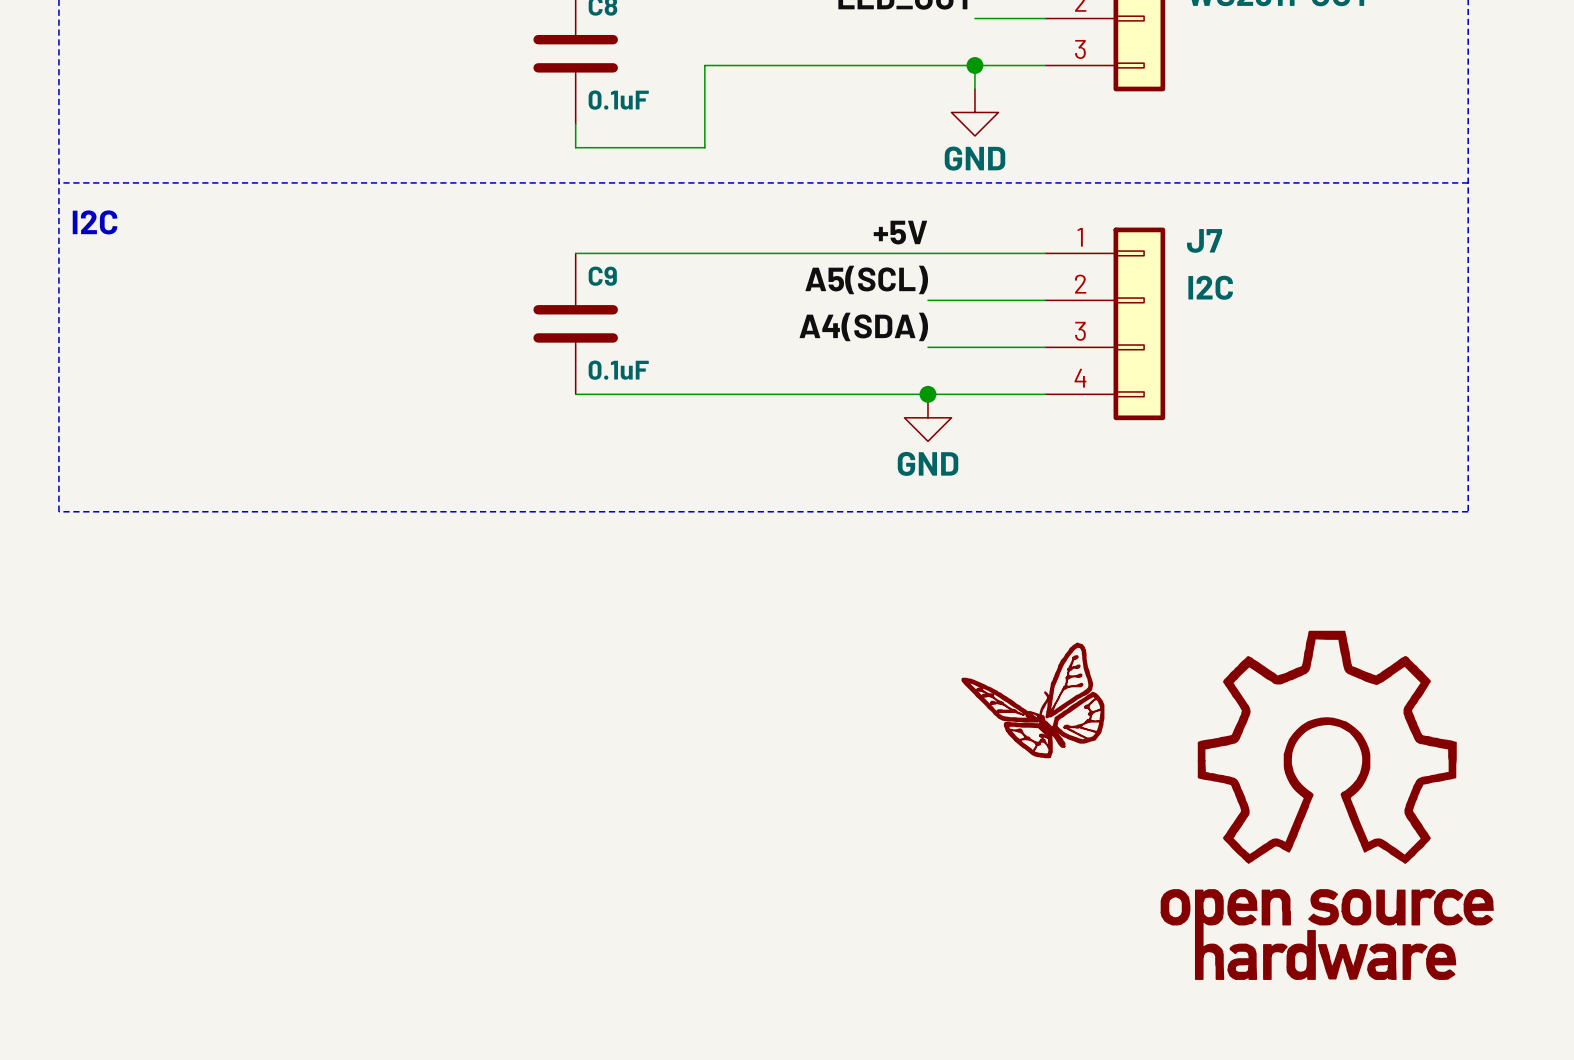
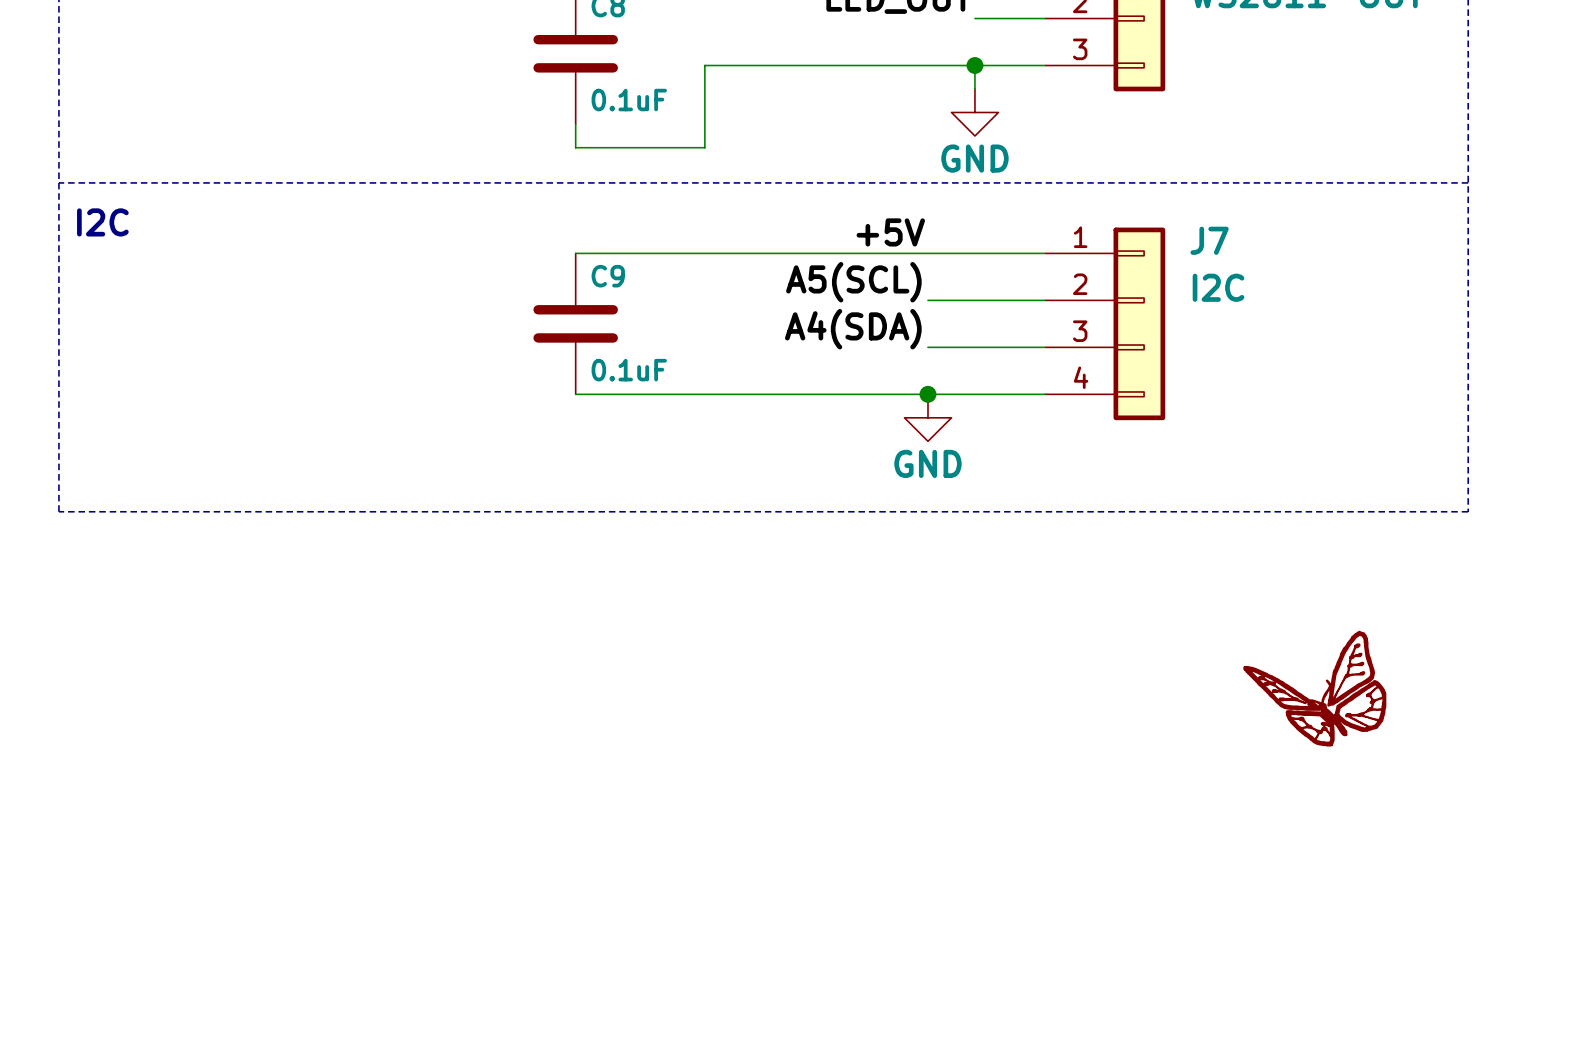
part position: (1032, 700) -> (1314, 688)
part: (1327, 805) -> none

